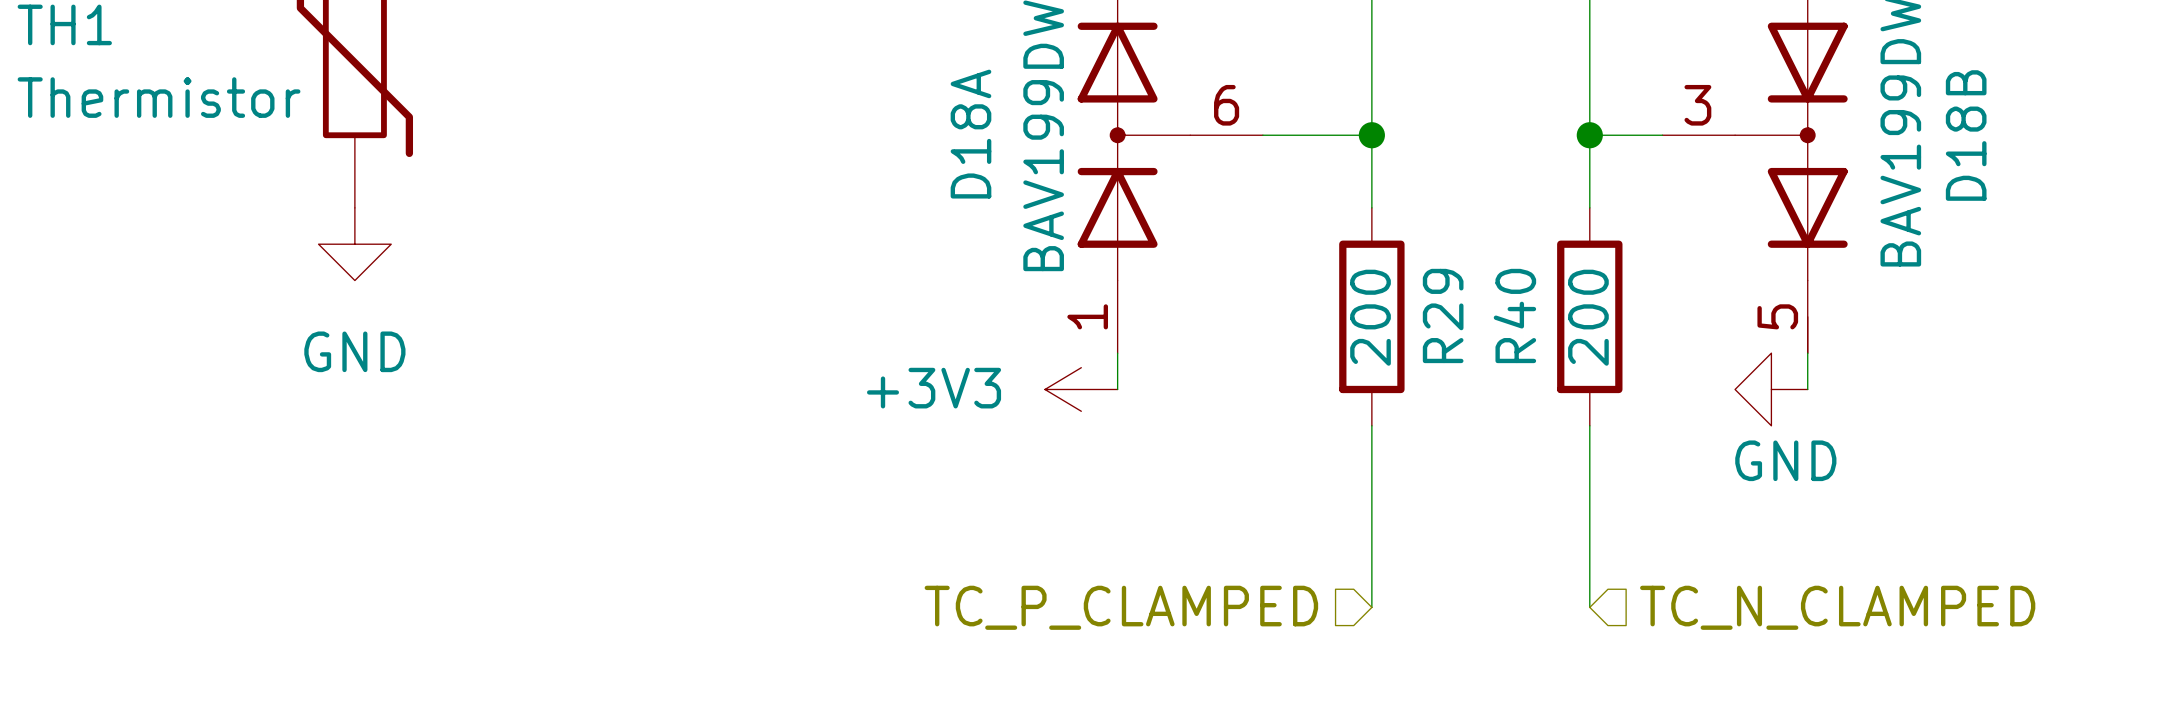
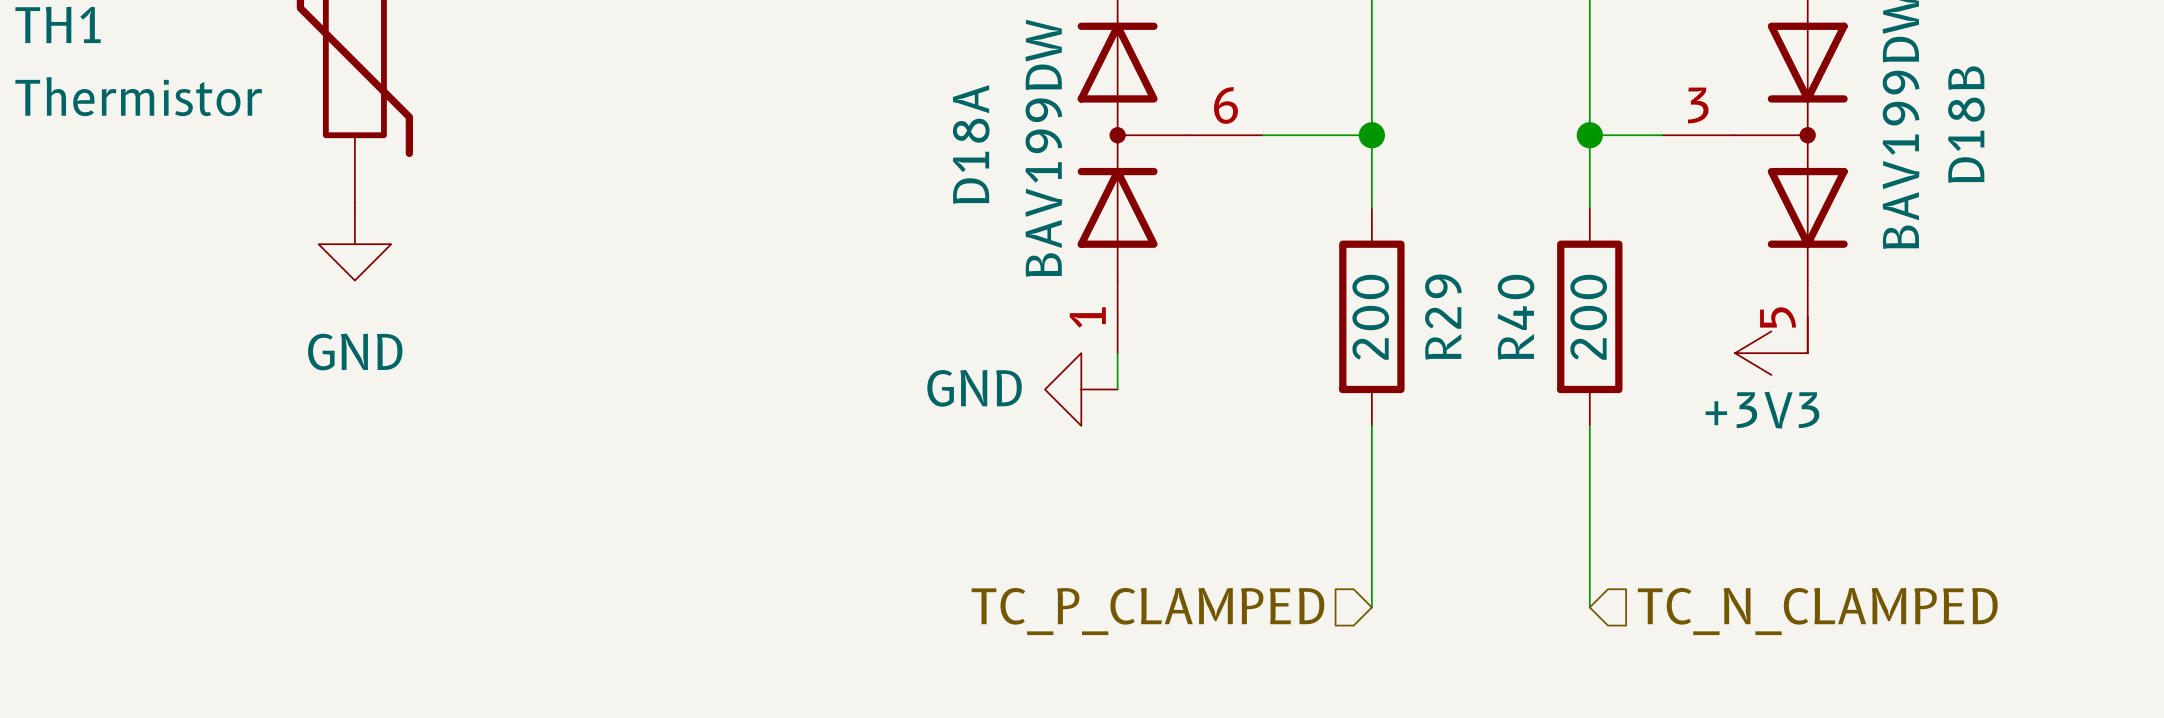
power symbol: none -> +3V3 (1771, 353)
wire: (1807, 353) (1807, 389) -> none
power symbol: +3V3 (1081, 389) -> GND (1081, 389)
power symbol: GND (1771, 389) -> none

